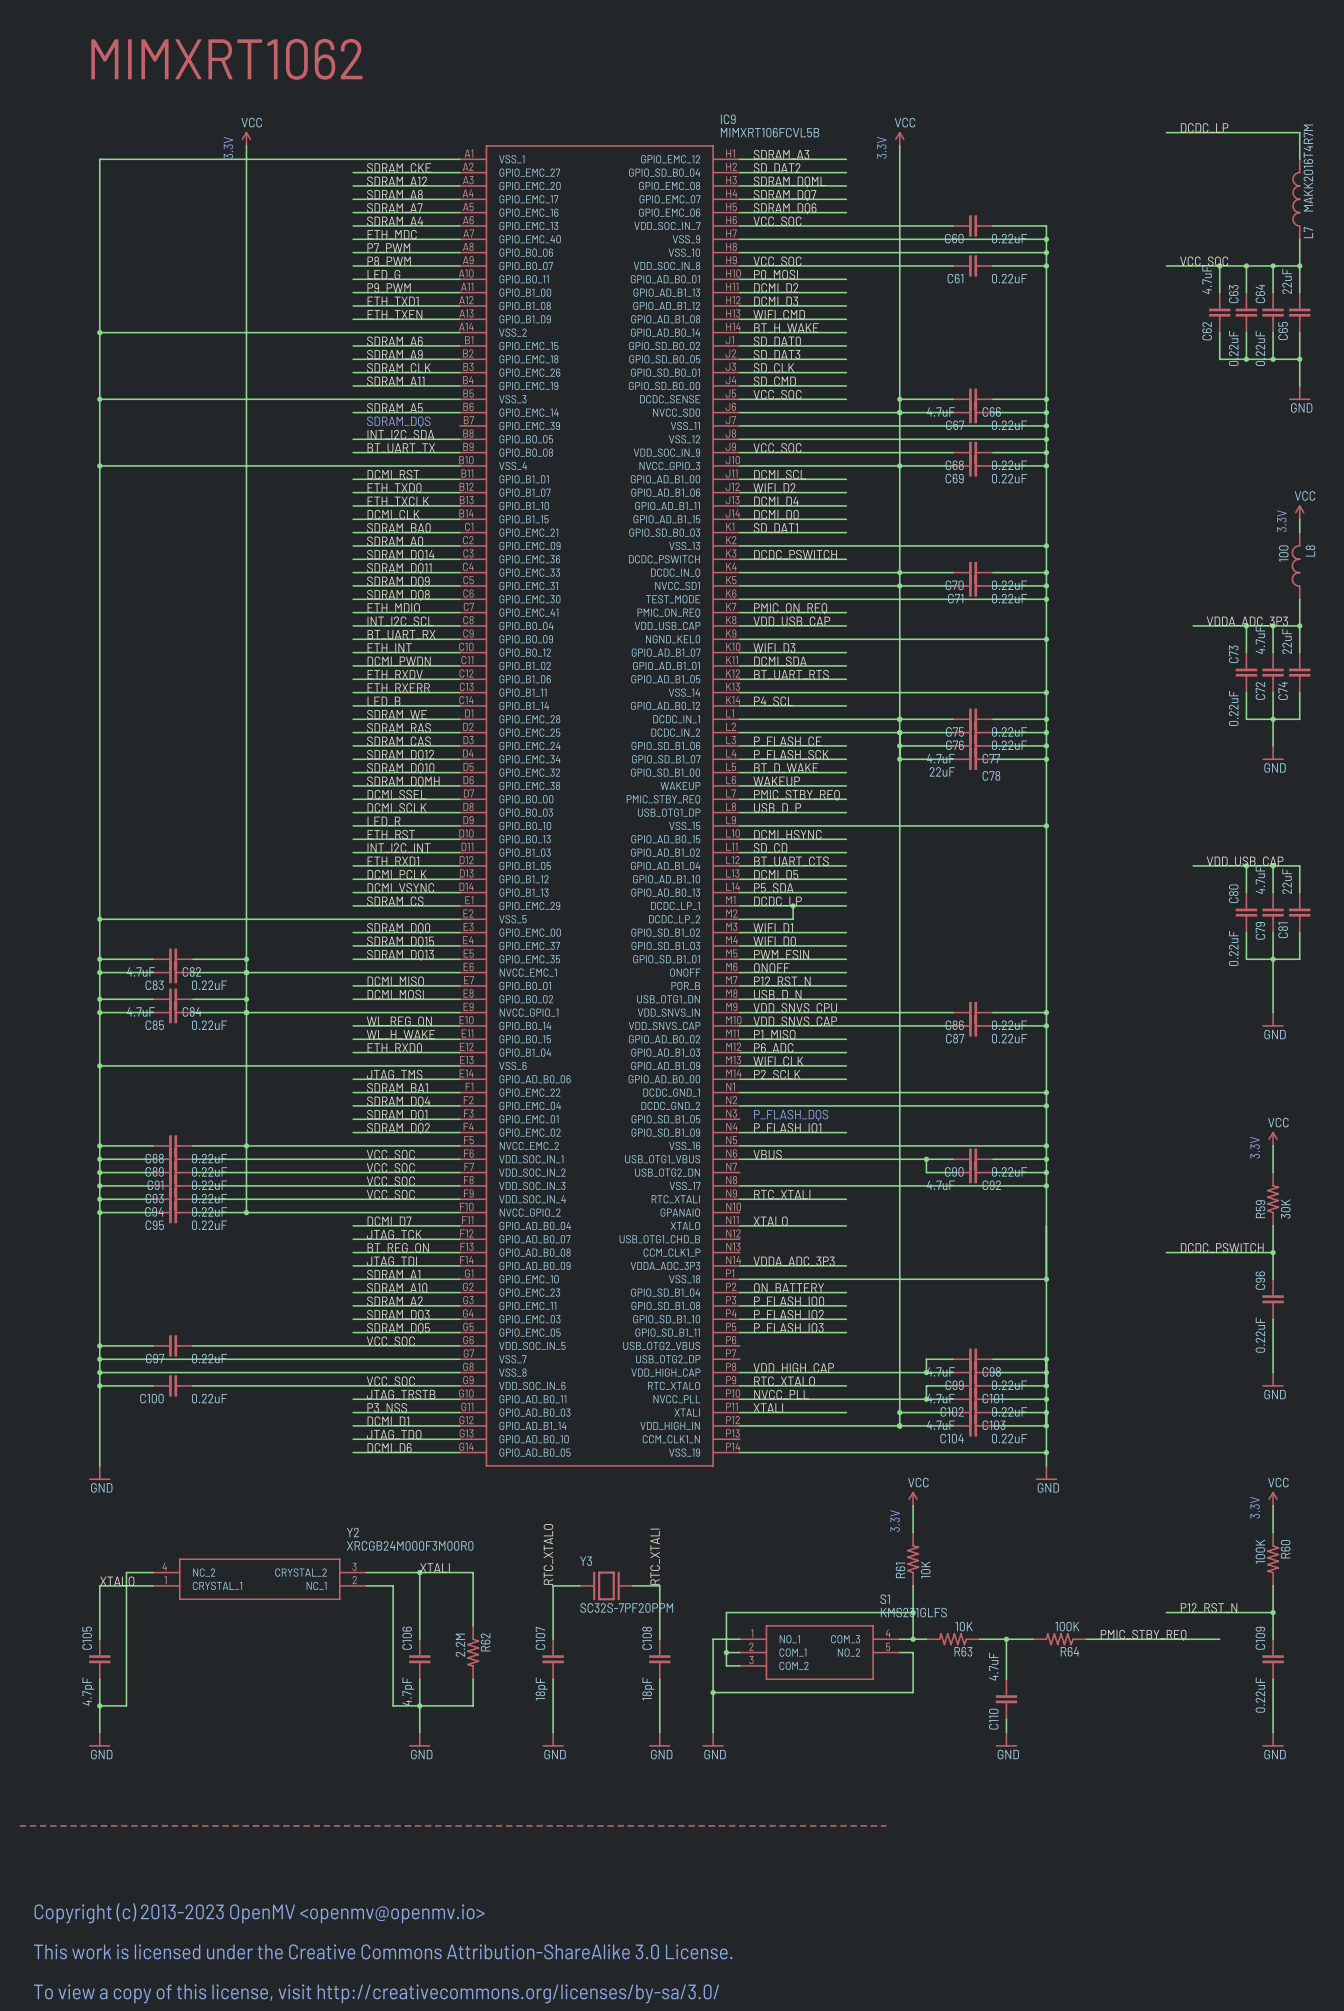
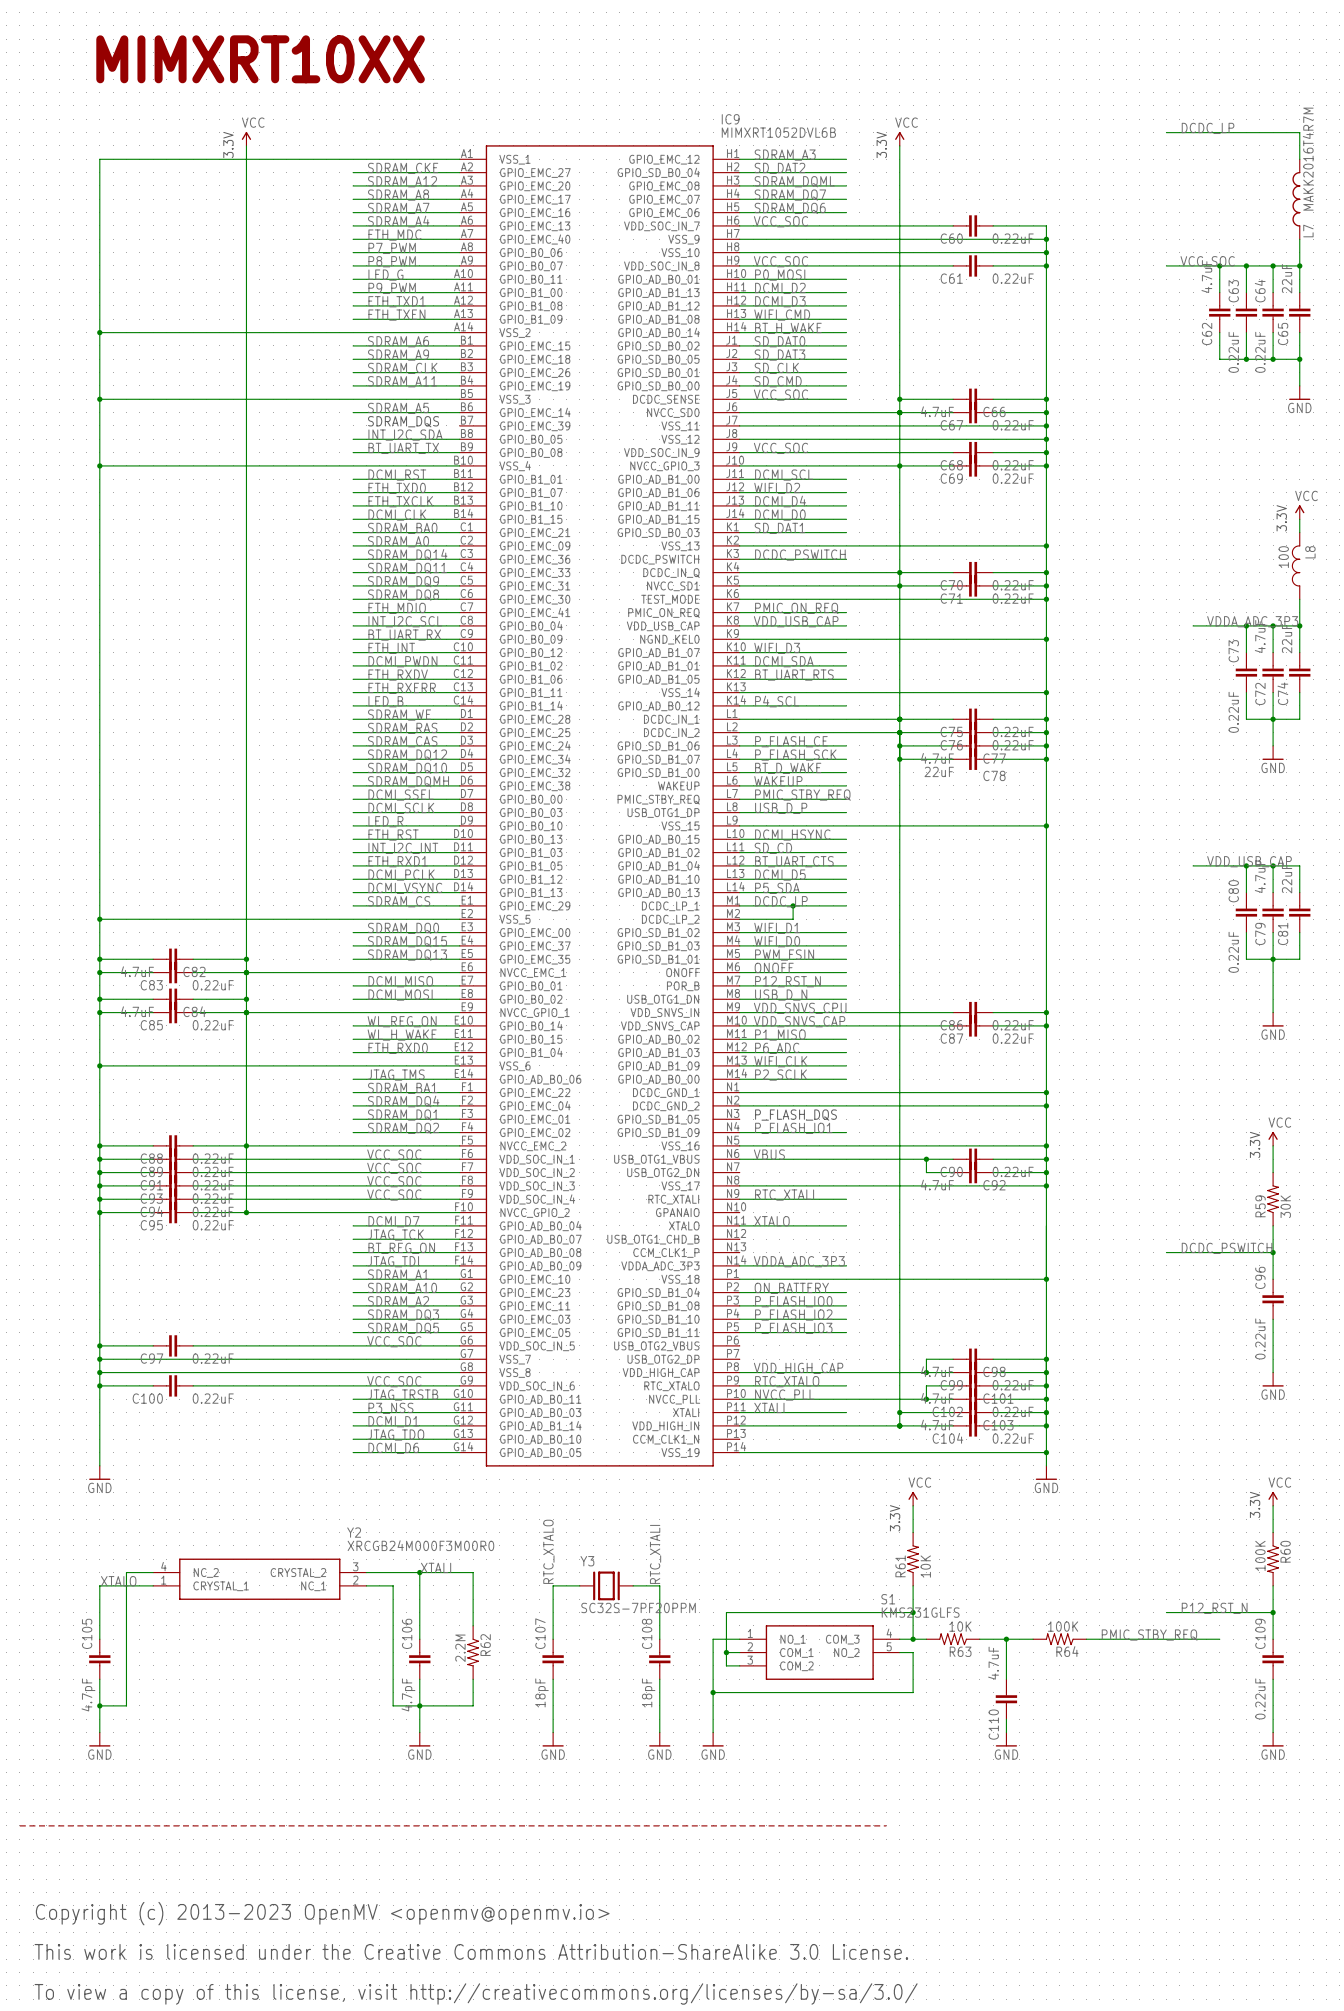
text: MIMXRT1062 (226, 59) -> MIMXRT10XX (260, 59)
IC9 value: MIMXRT106FCVL5B (770, 132) -> MIMXRT1052DVL6B (778, 132)

